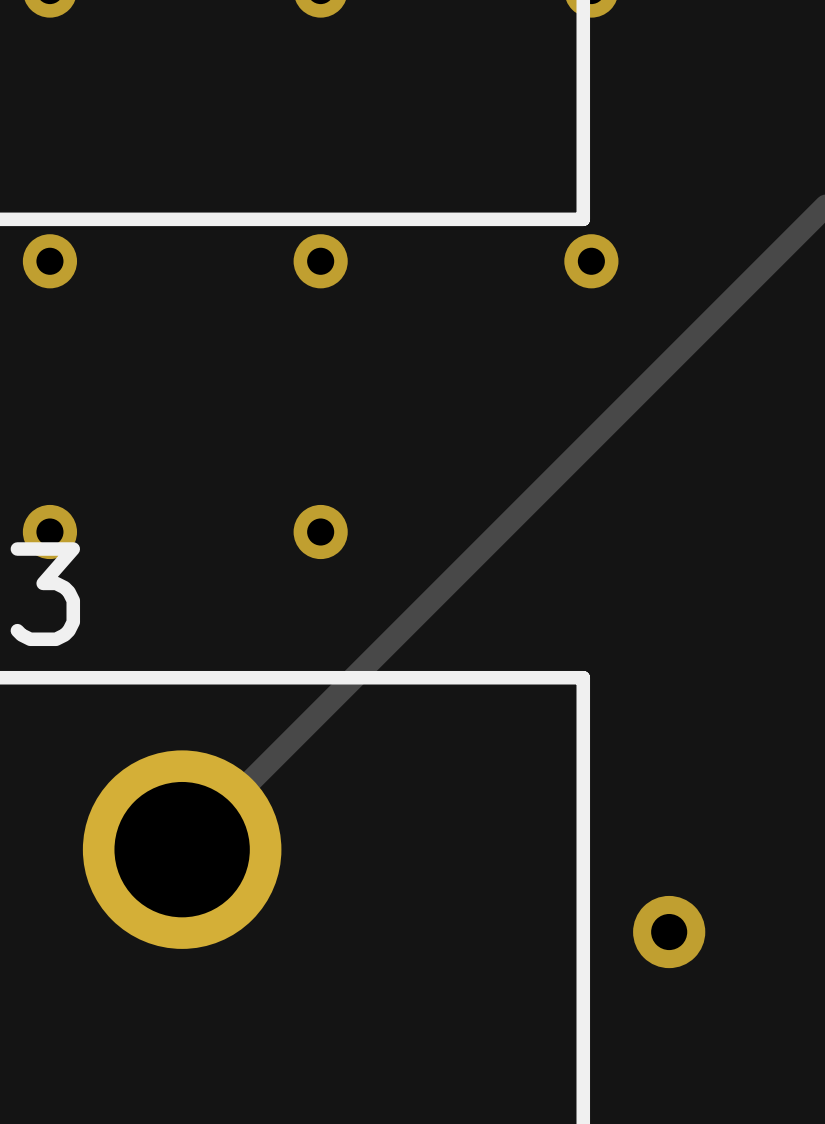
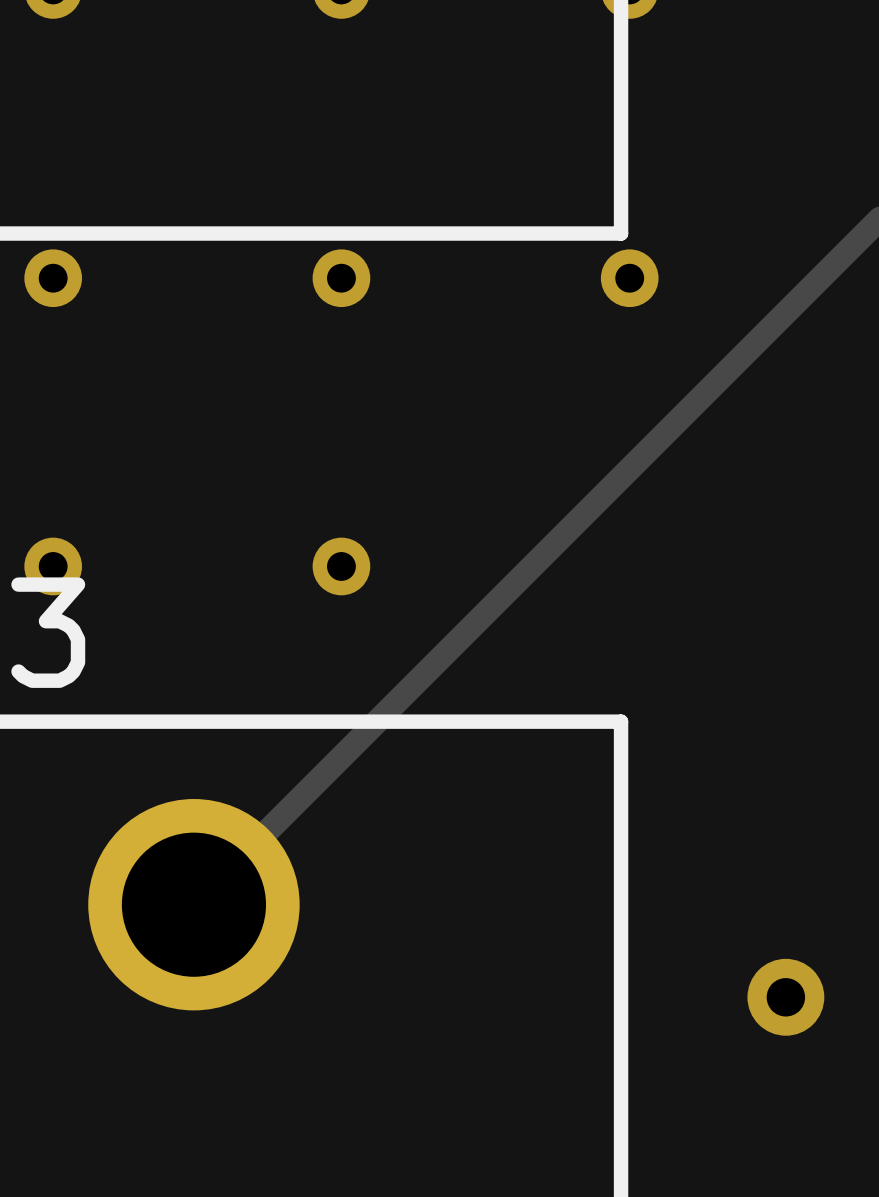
via position: (669, 932) -> (785, 997)

